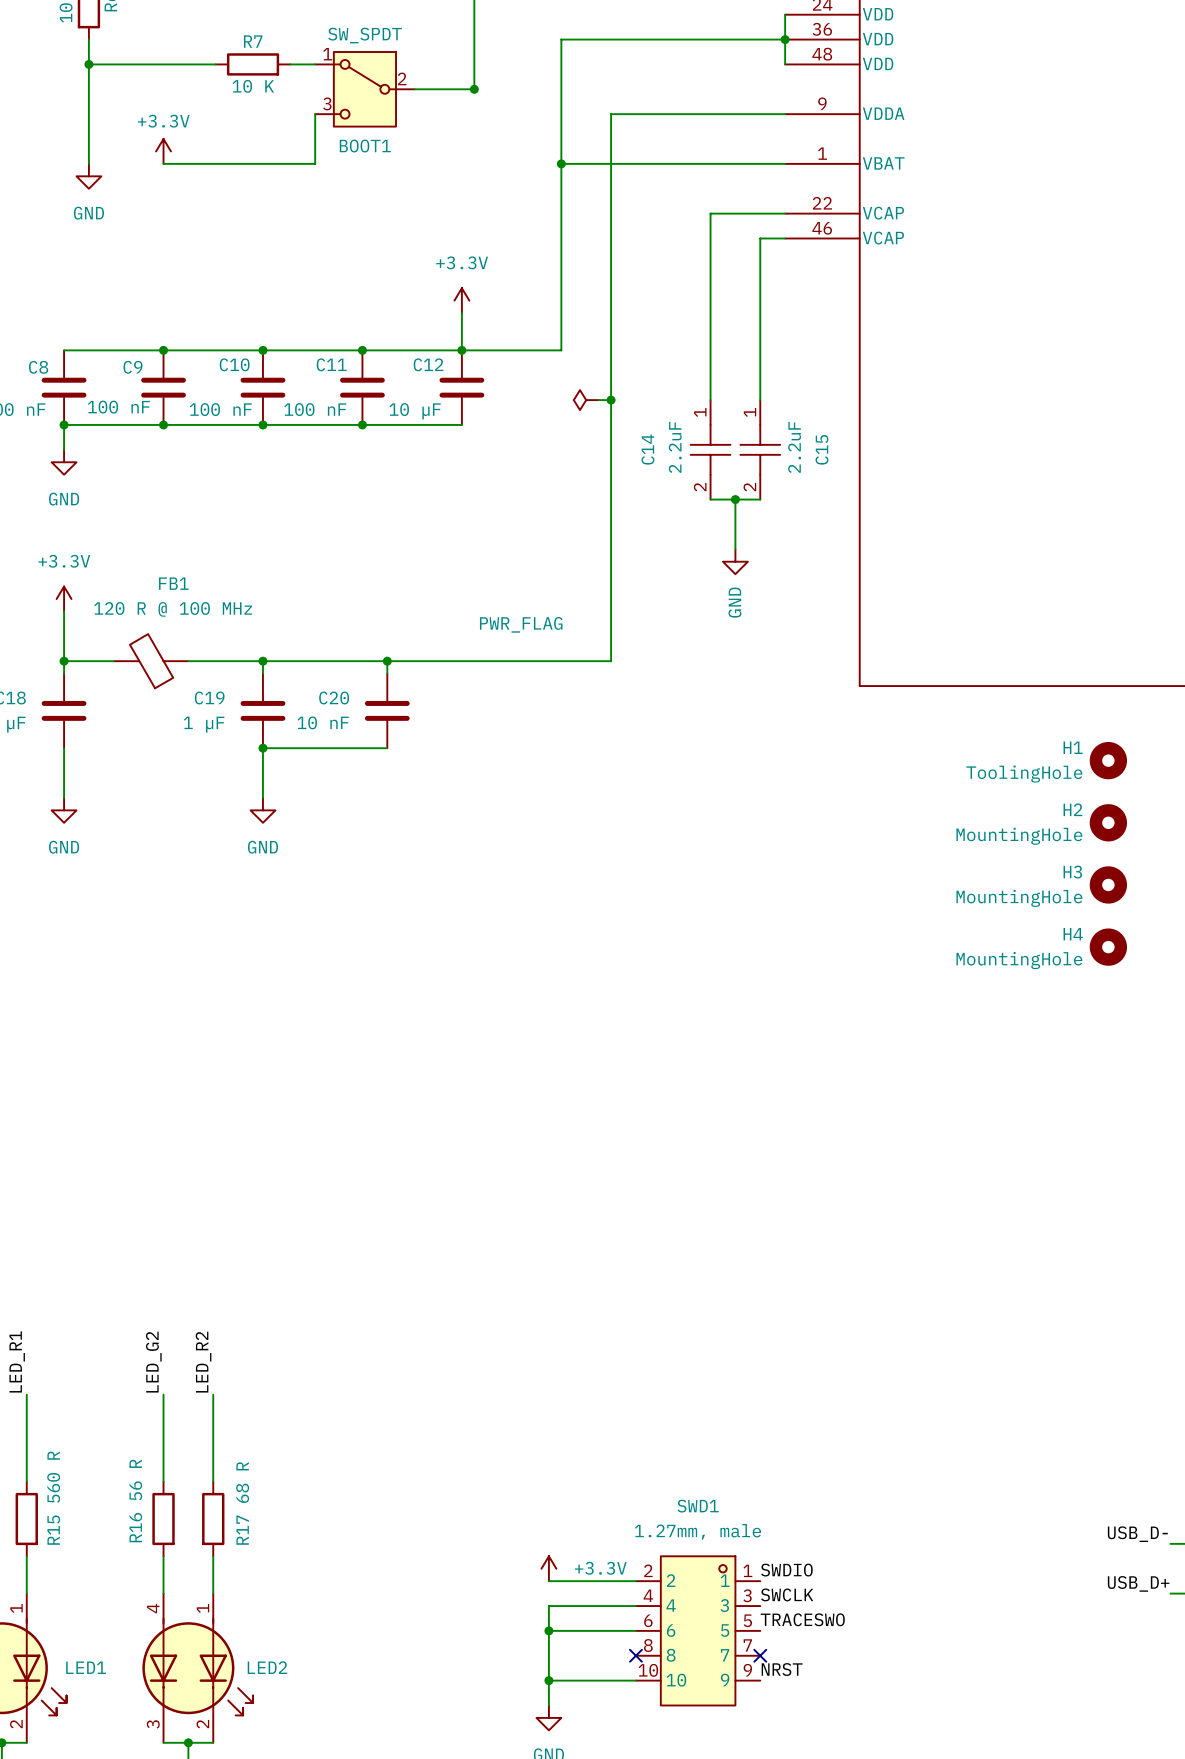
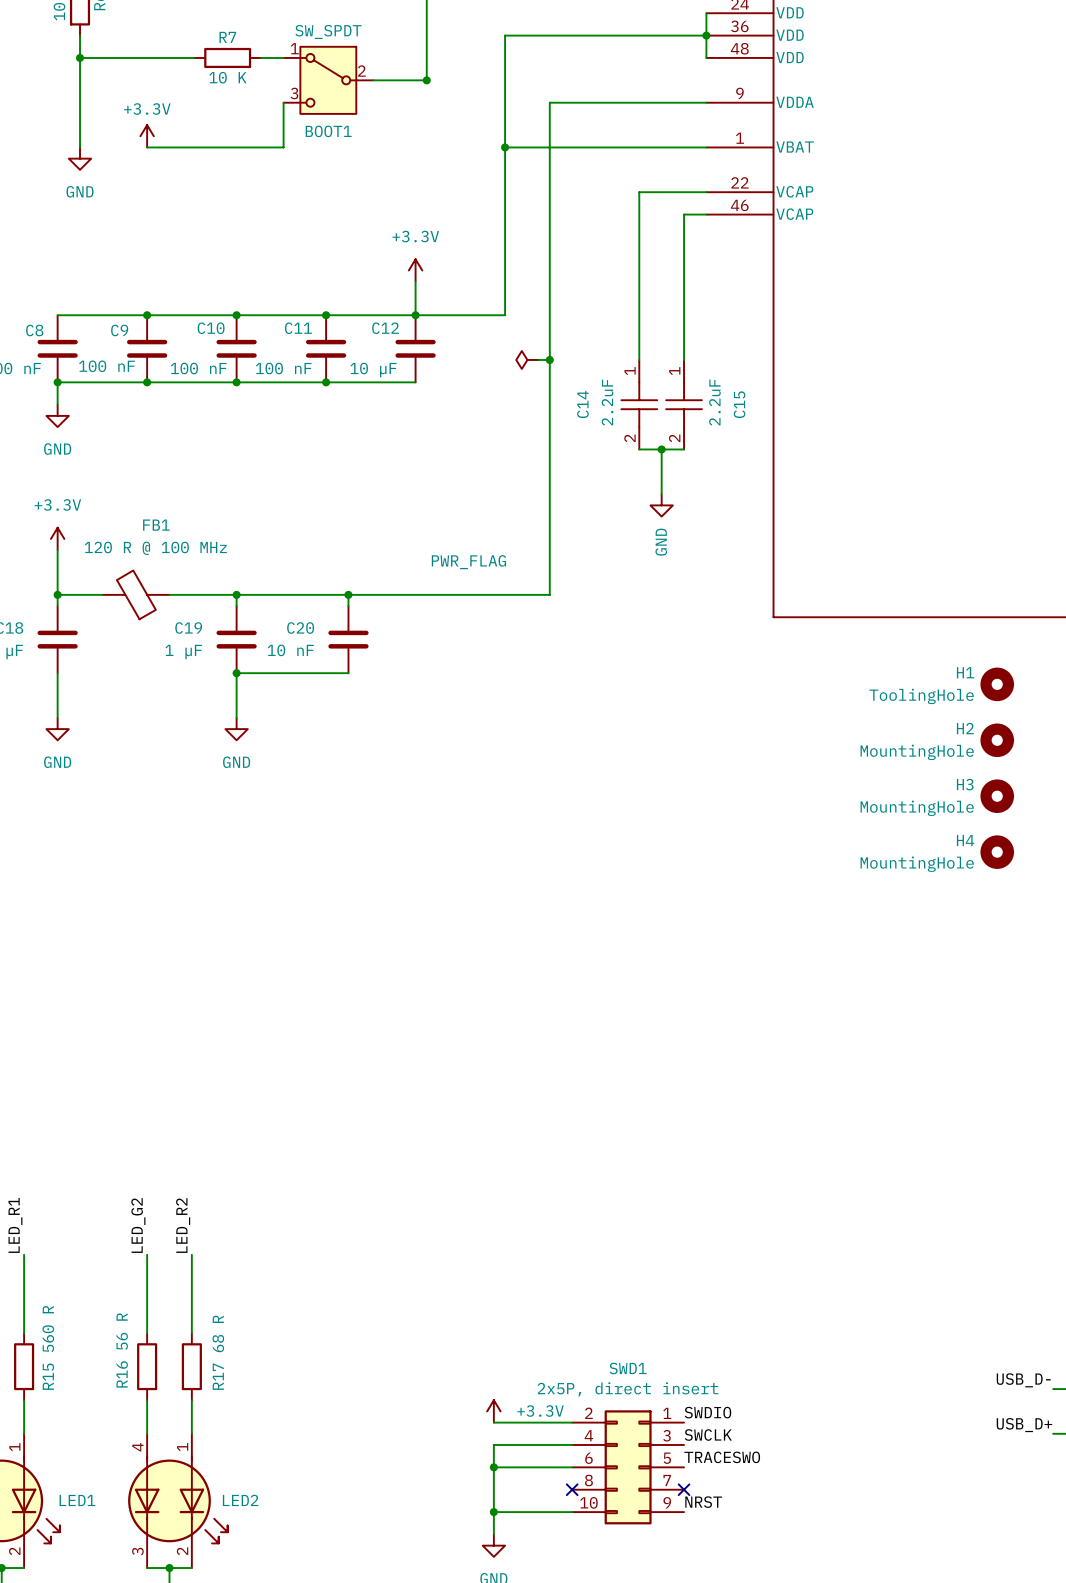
SWD1 value: 1.27mm, male (697, 1531) -> 2x5P, direct insert (628, 1389)
SWD1 symbol: [635, 1556, 761, 1706] -> [572, 1410, 685, 1525]

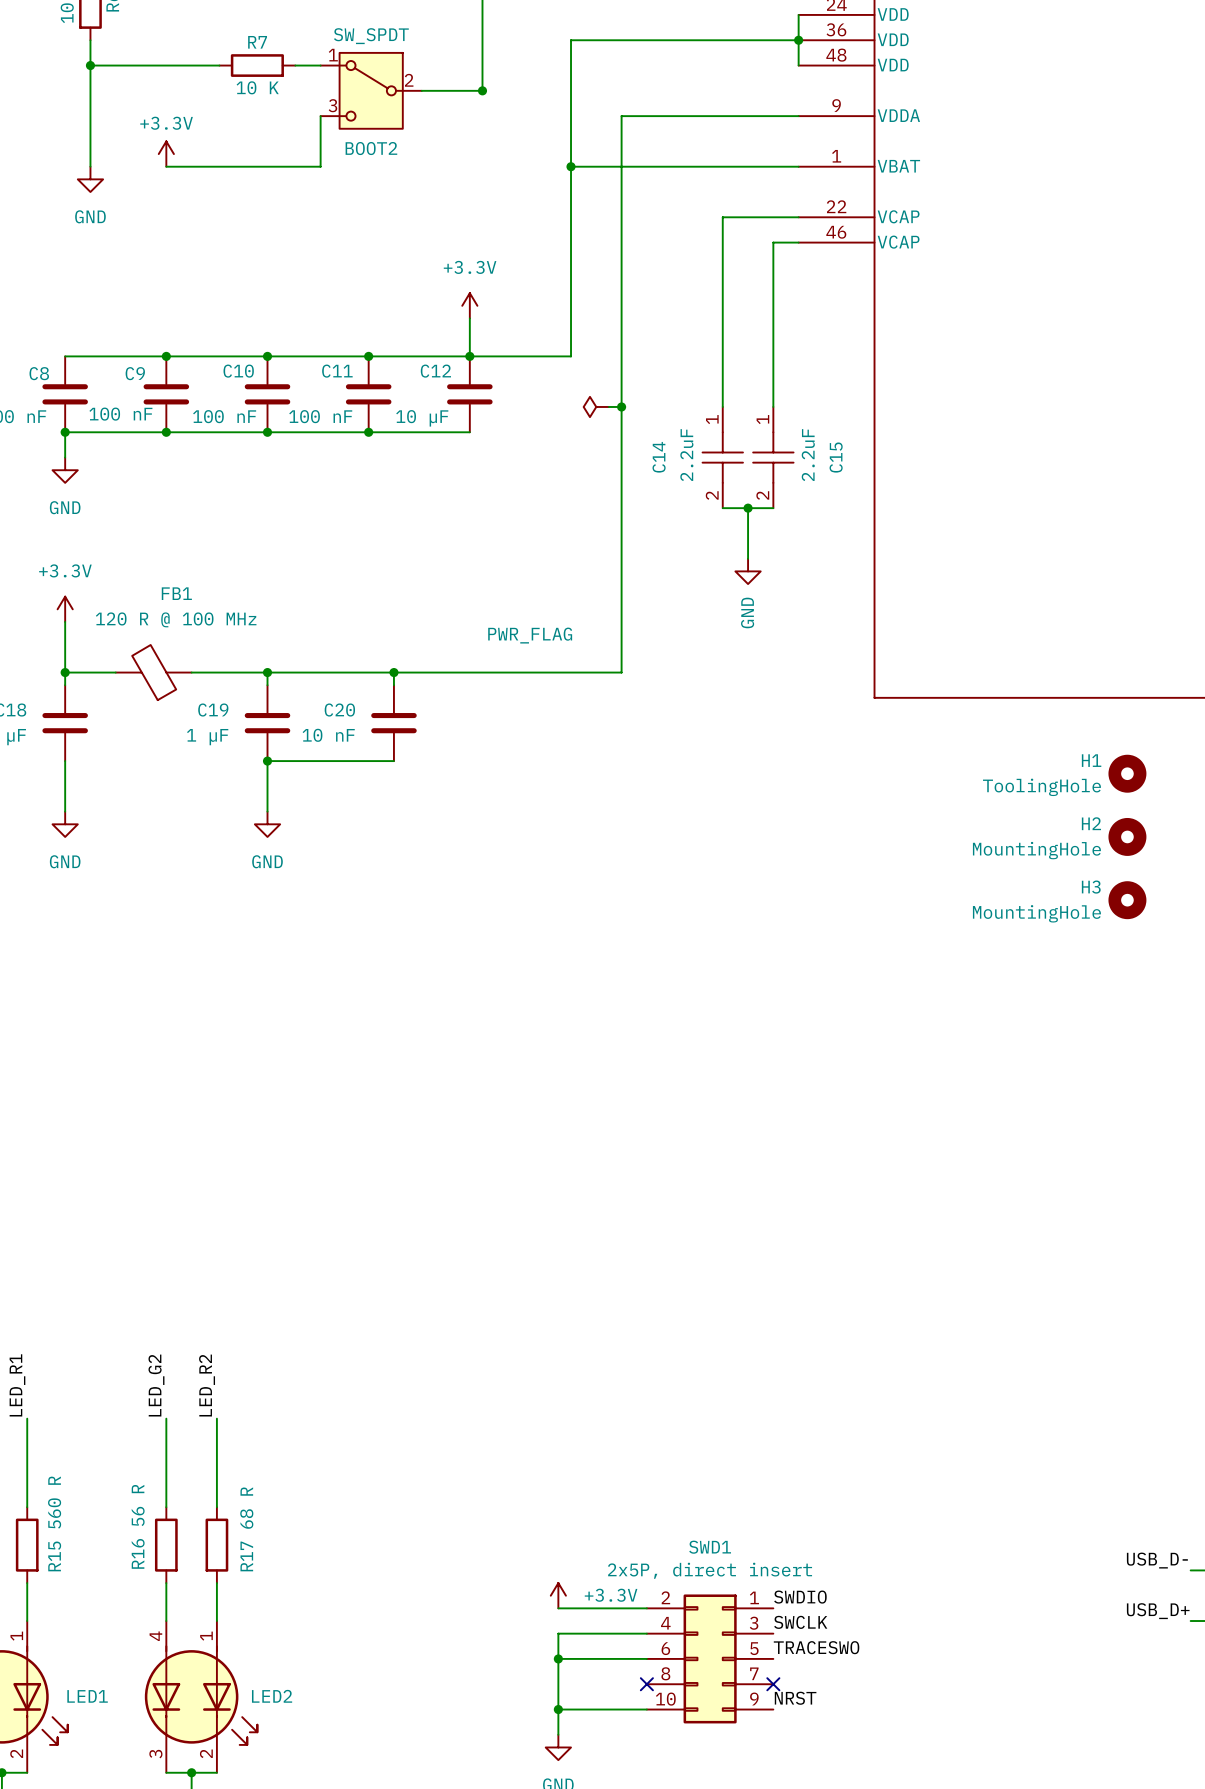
BOOT1 name: BOOT1 (328, 131) -> BOOT2 (371, 148)
H4: MountingHole (997, 852) -> none

